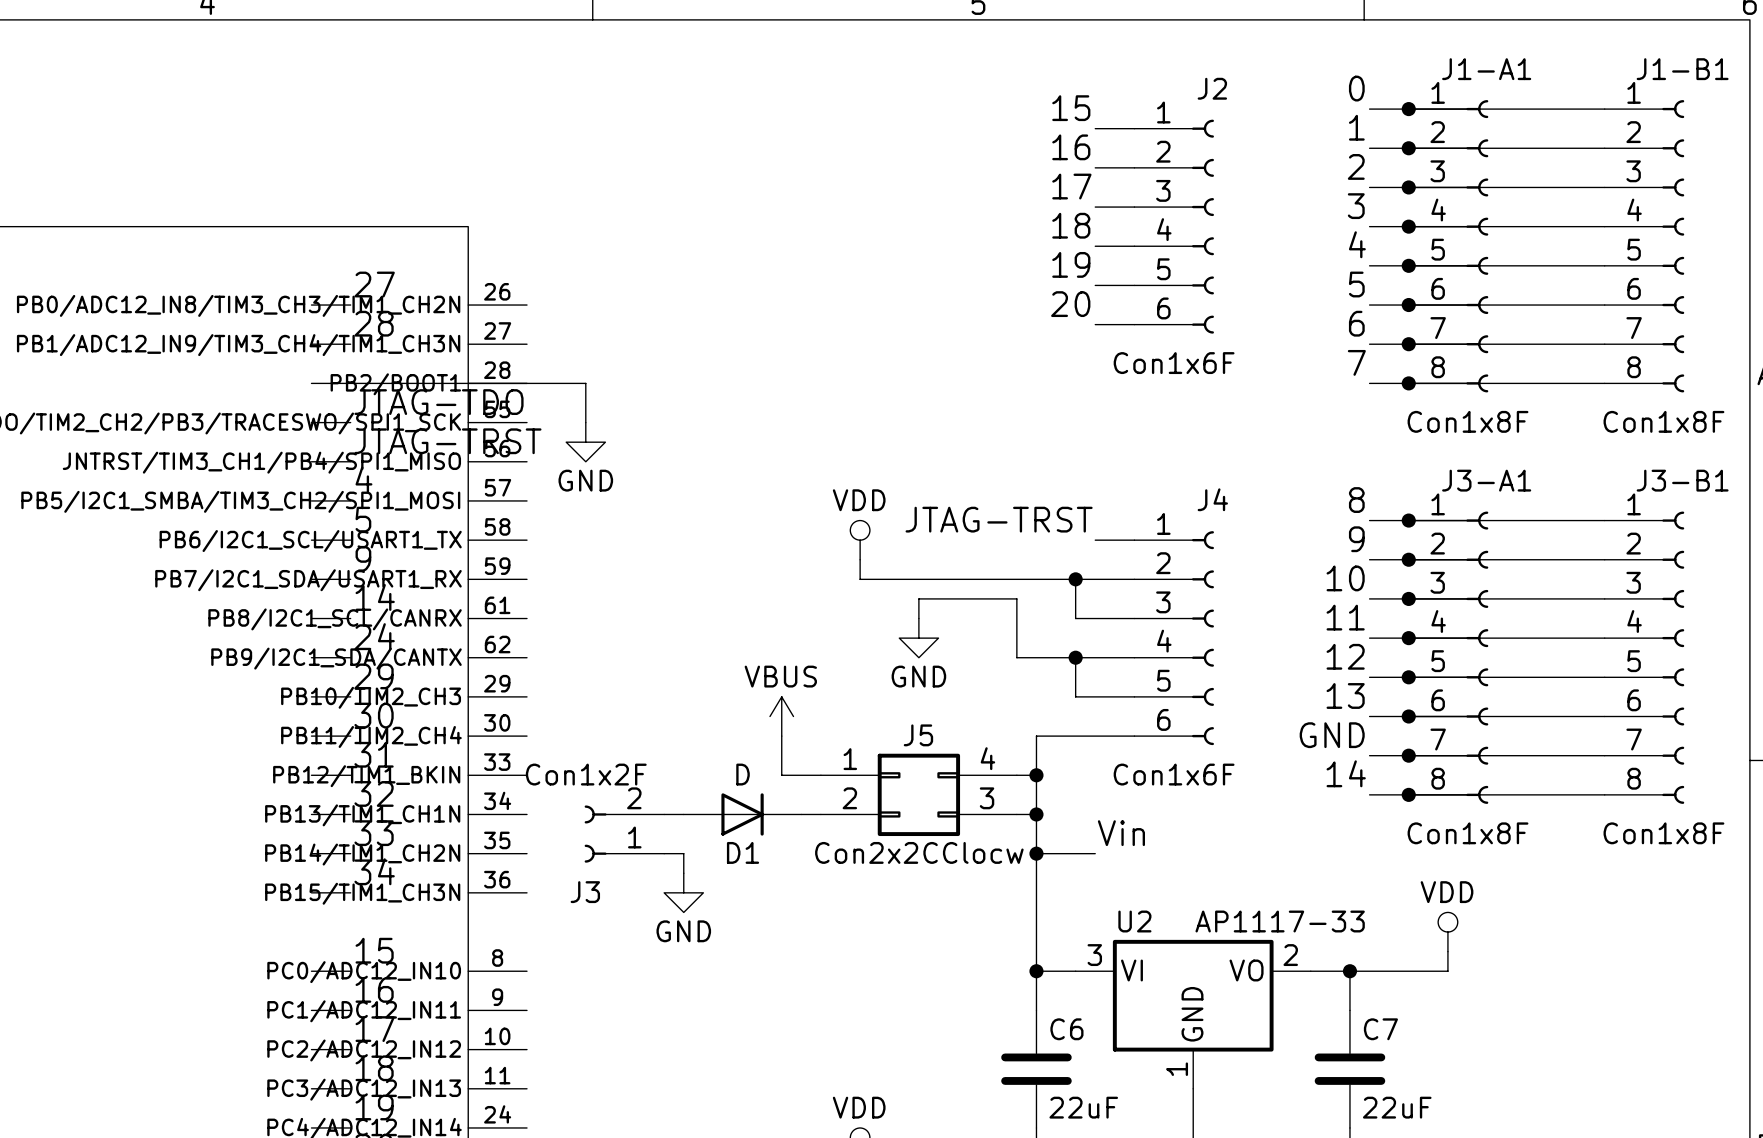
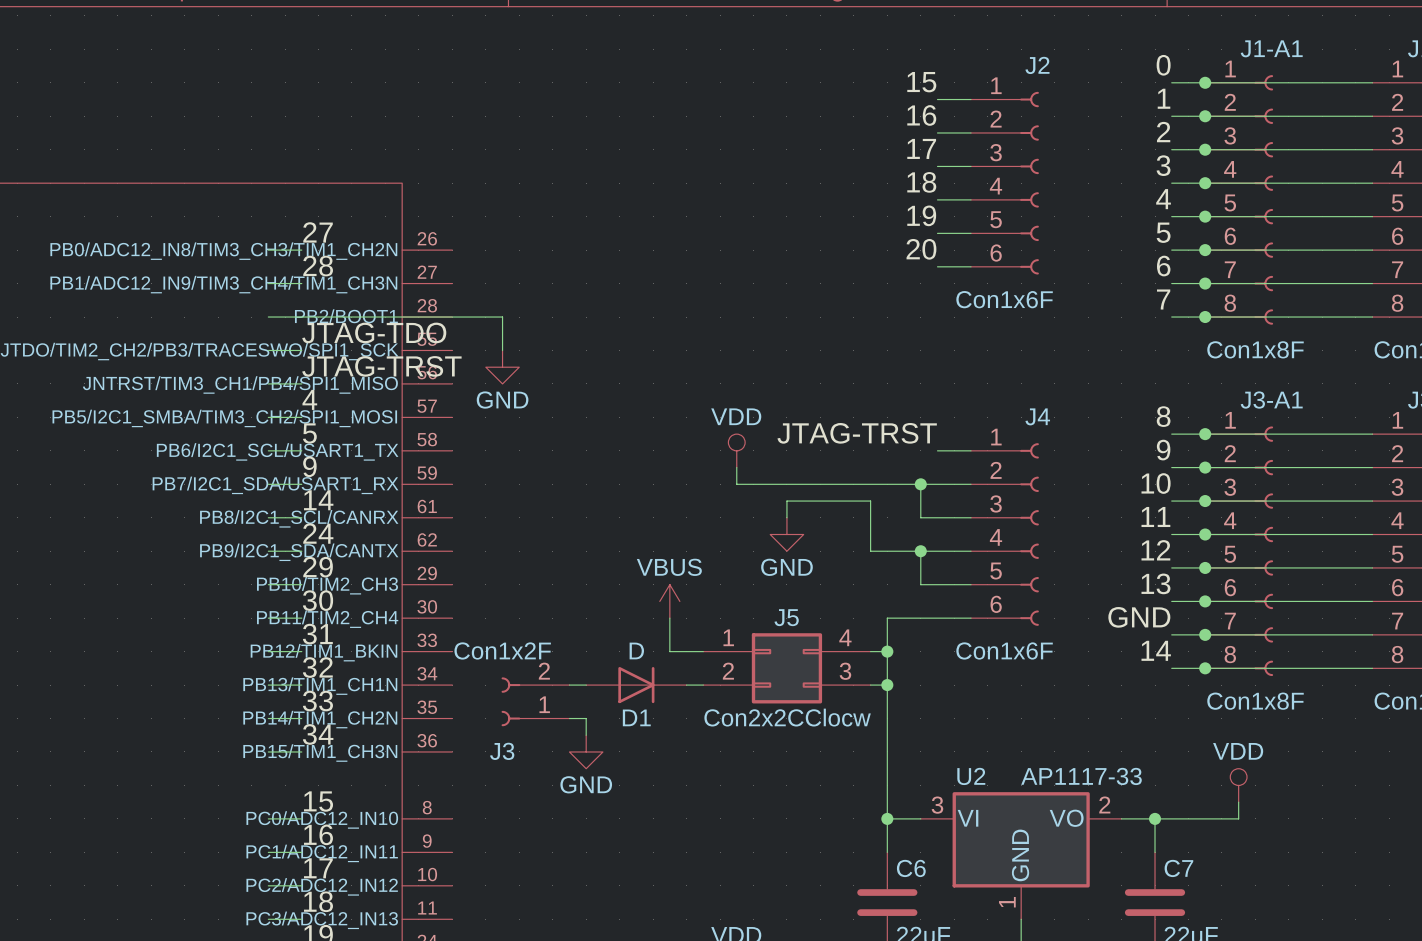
label: Vin (1121, 833) -> none
wire: (1036, 853) (1095, 853) -> none
junction: (1036, 853) -> none

